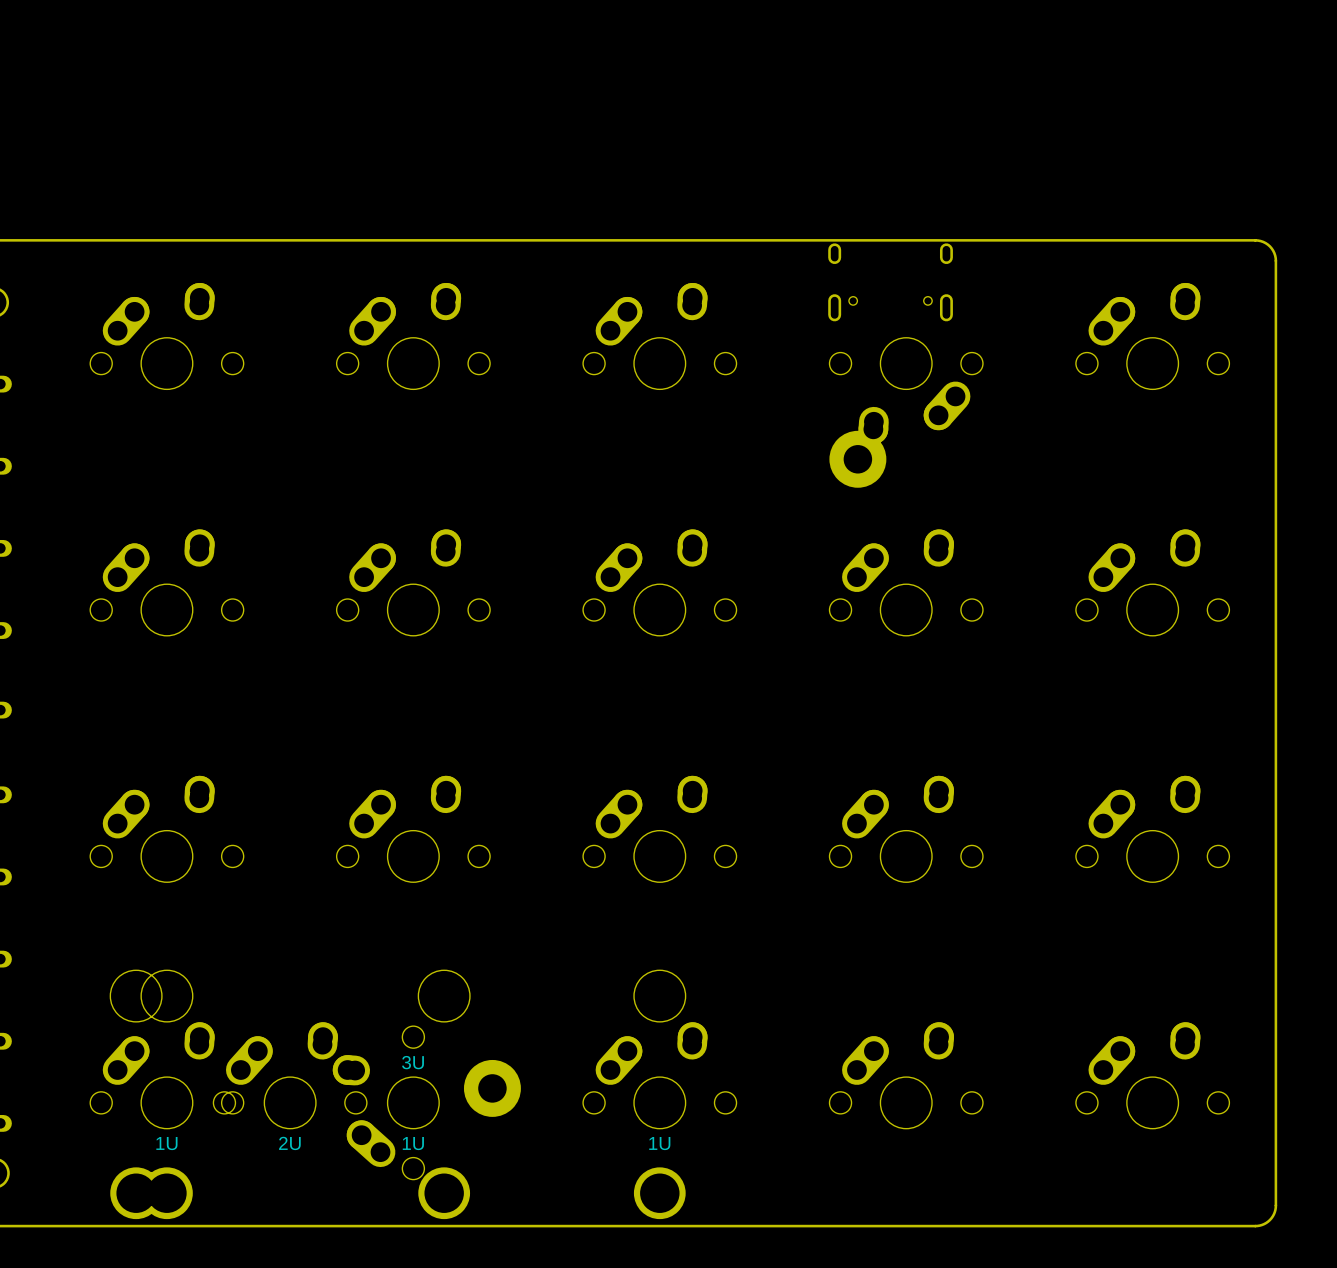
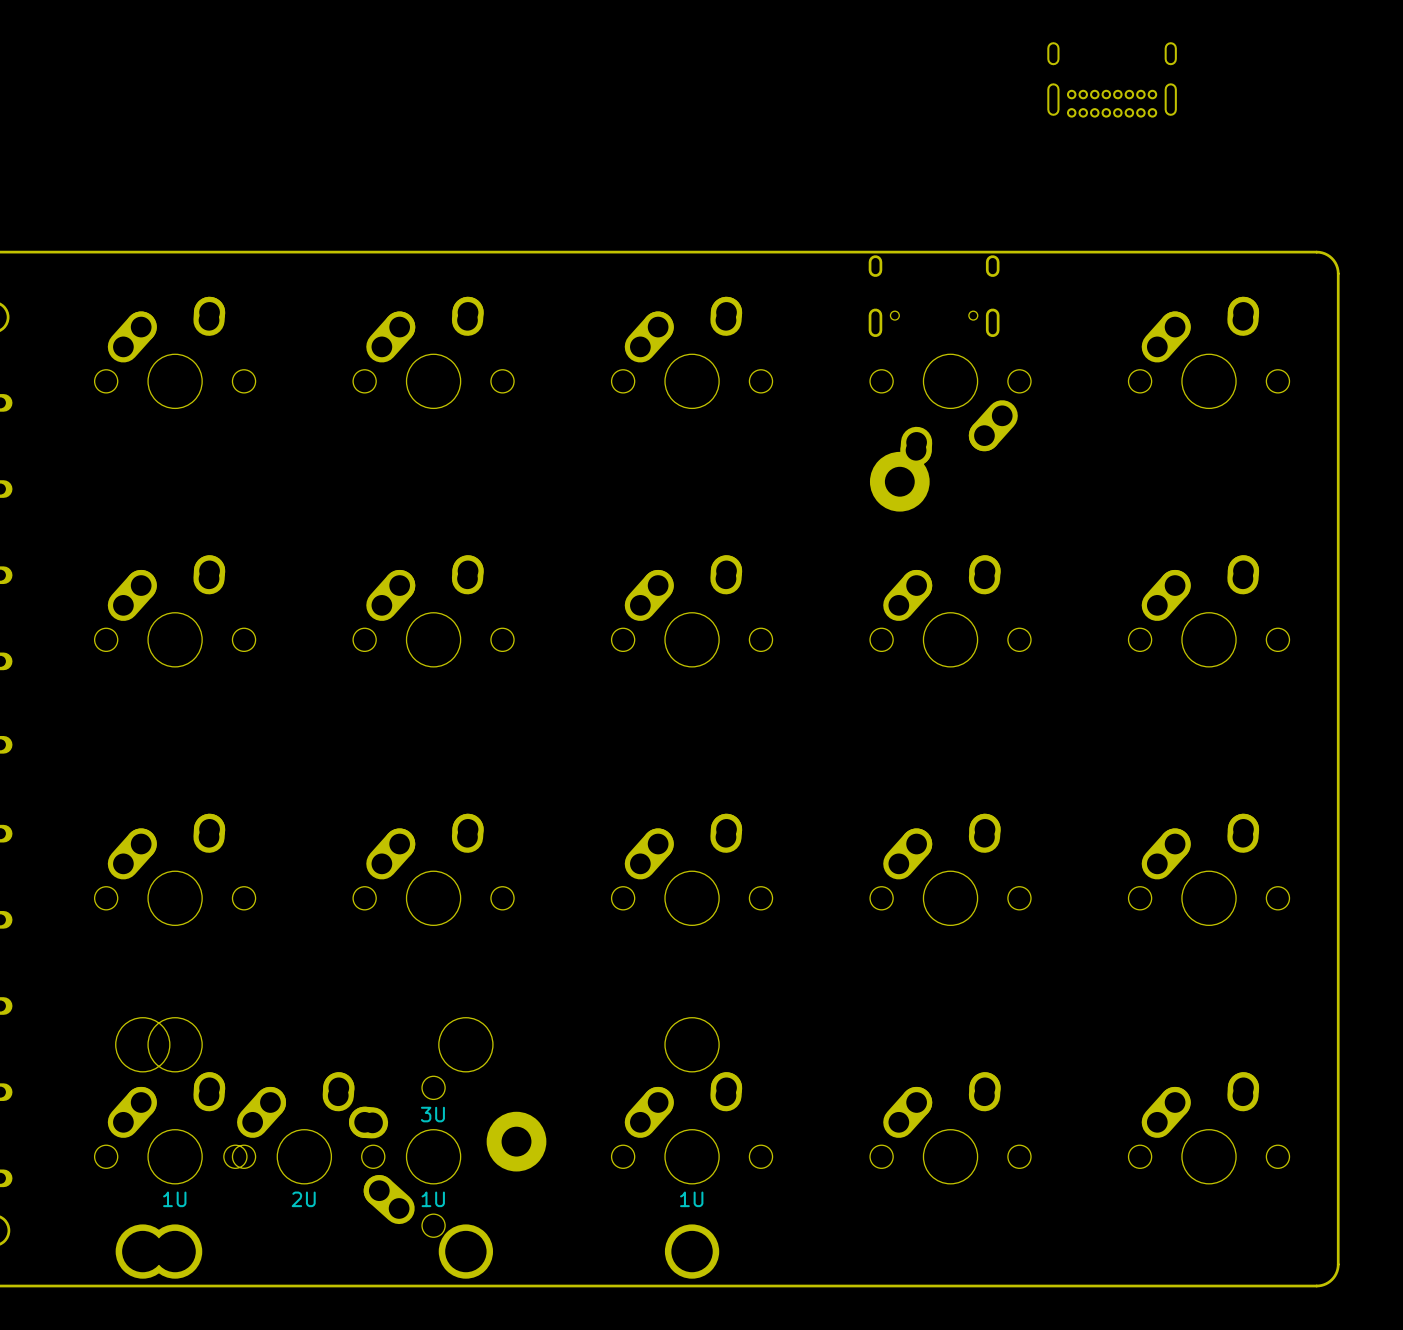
part: none -> (1112, 79)

